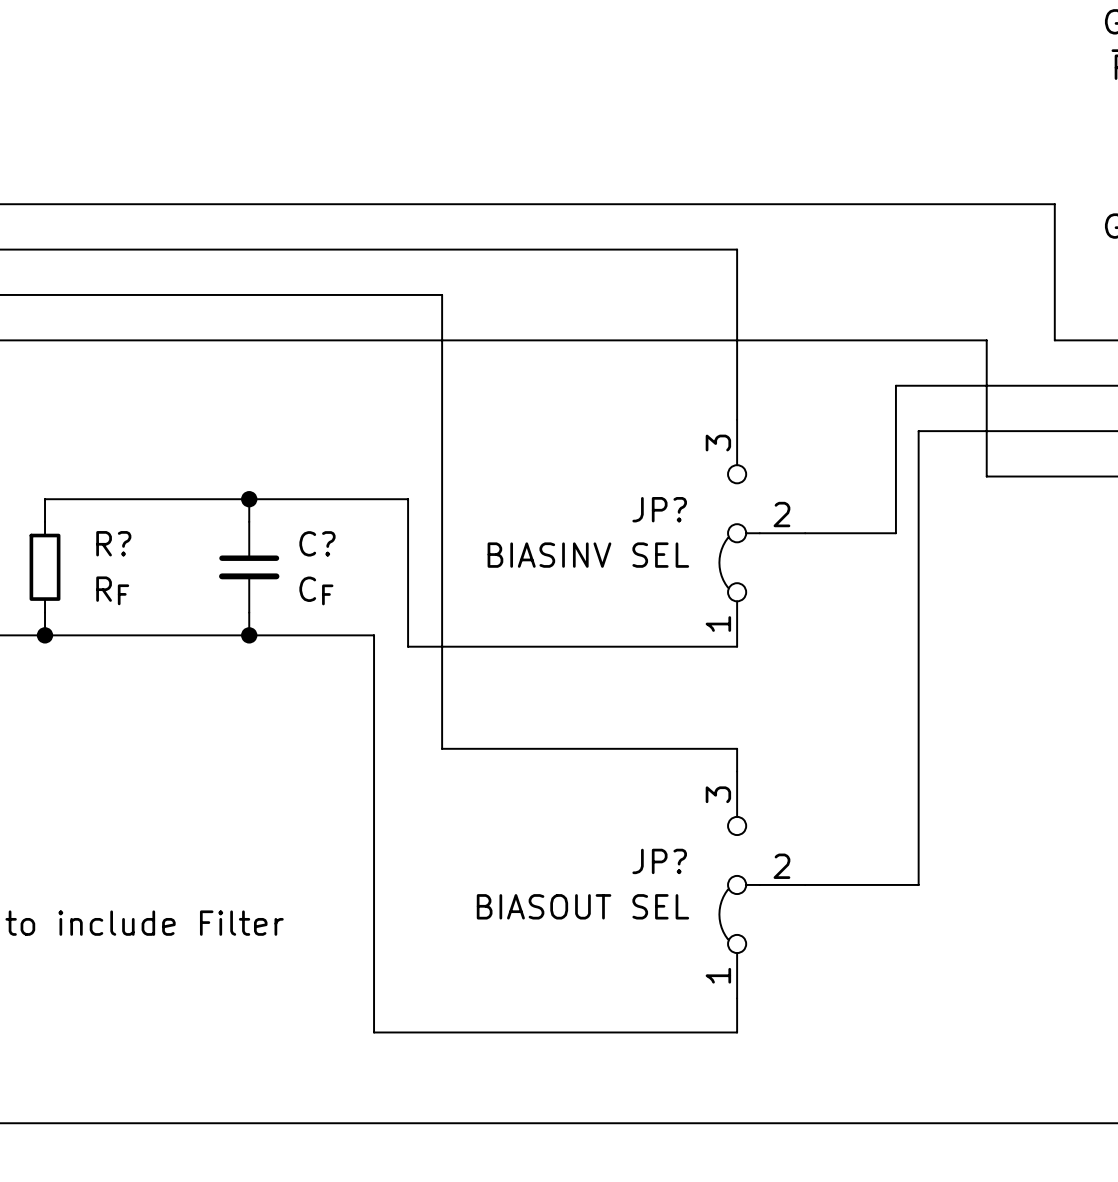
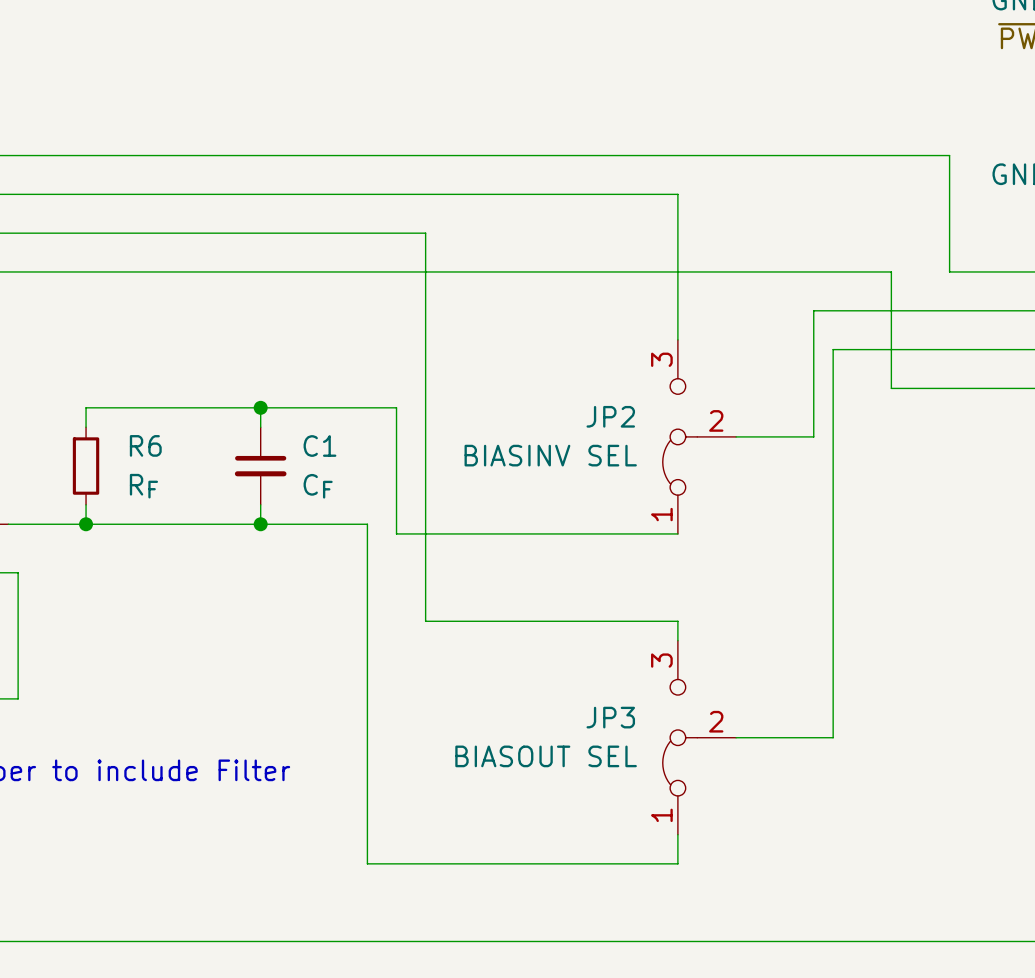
JP? name: JP? (659, 509) -> JP2 (610, 416)
R? name: R? (113, 543) -> R6 (145, 445)
C? name: C? (317, 543) -> C1 (319, 446)
JP? name: JP? (659, 861) -> JP3 (610, 717)

